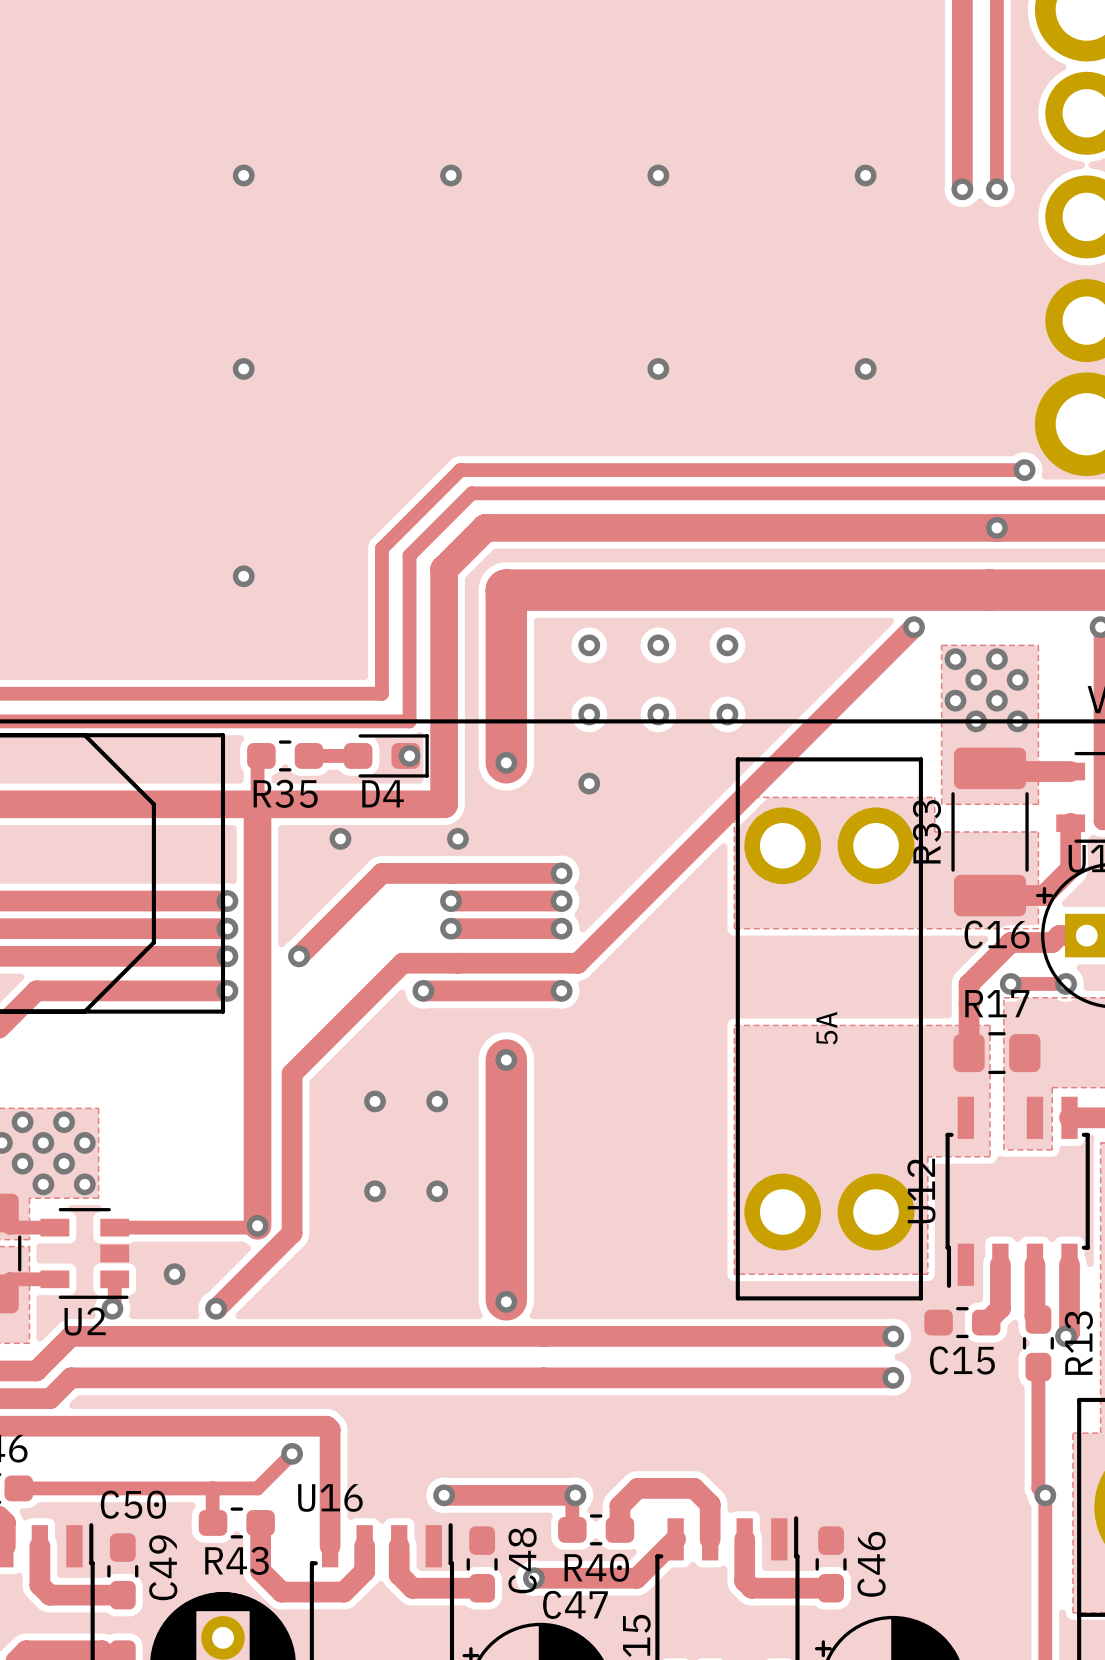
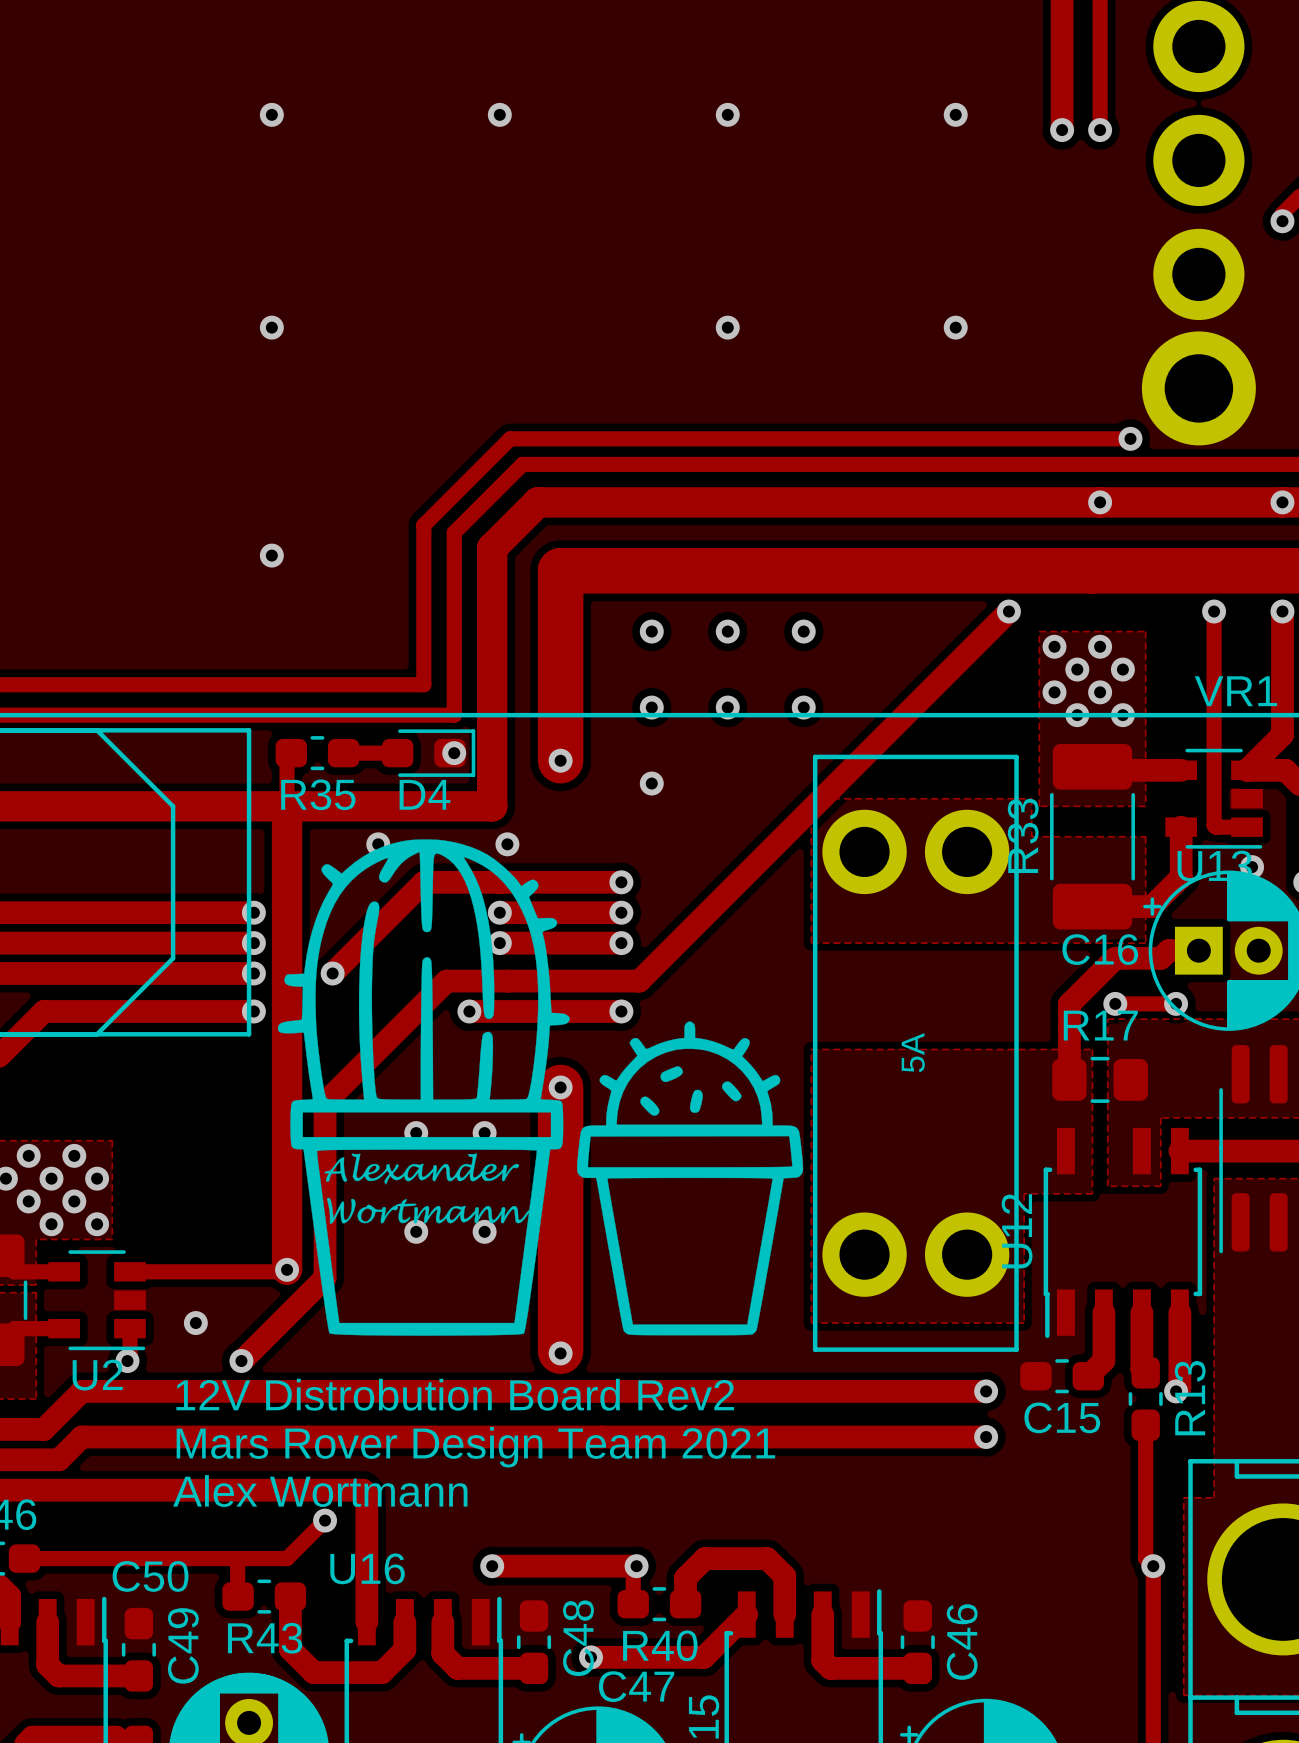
drawing: none -> [277, 839, 804, 1336]
text: none -> 12V Distrobution Board Rev2 (455, 1394)
text: none -> Mars Rover Design Team 2021 (475, 1447)
text: none -> Alex Wortmann (320, 1491)

